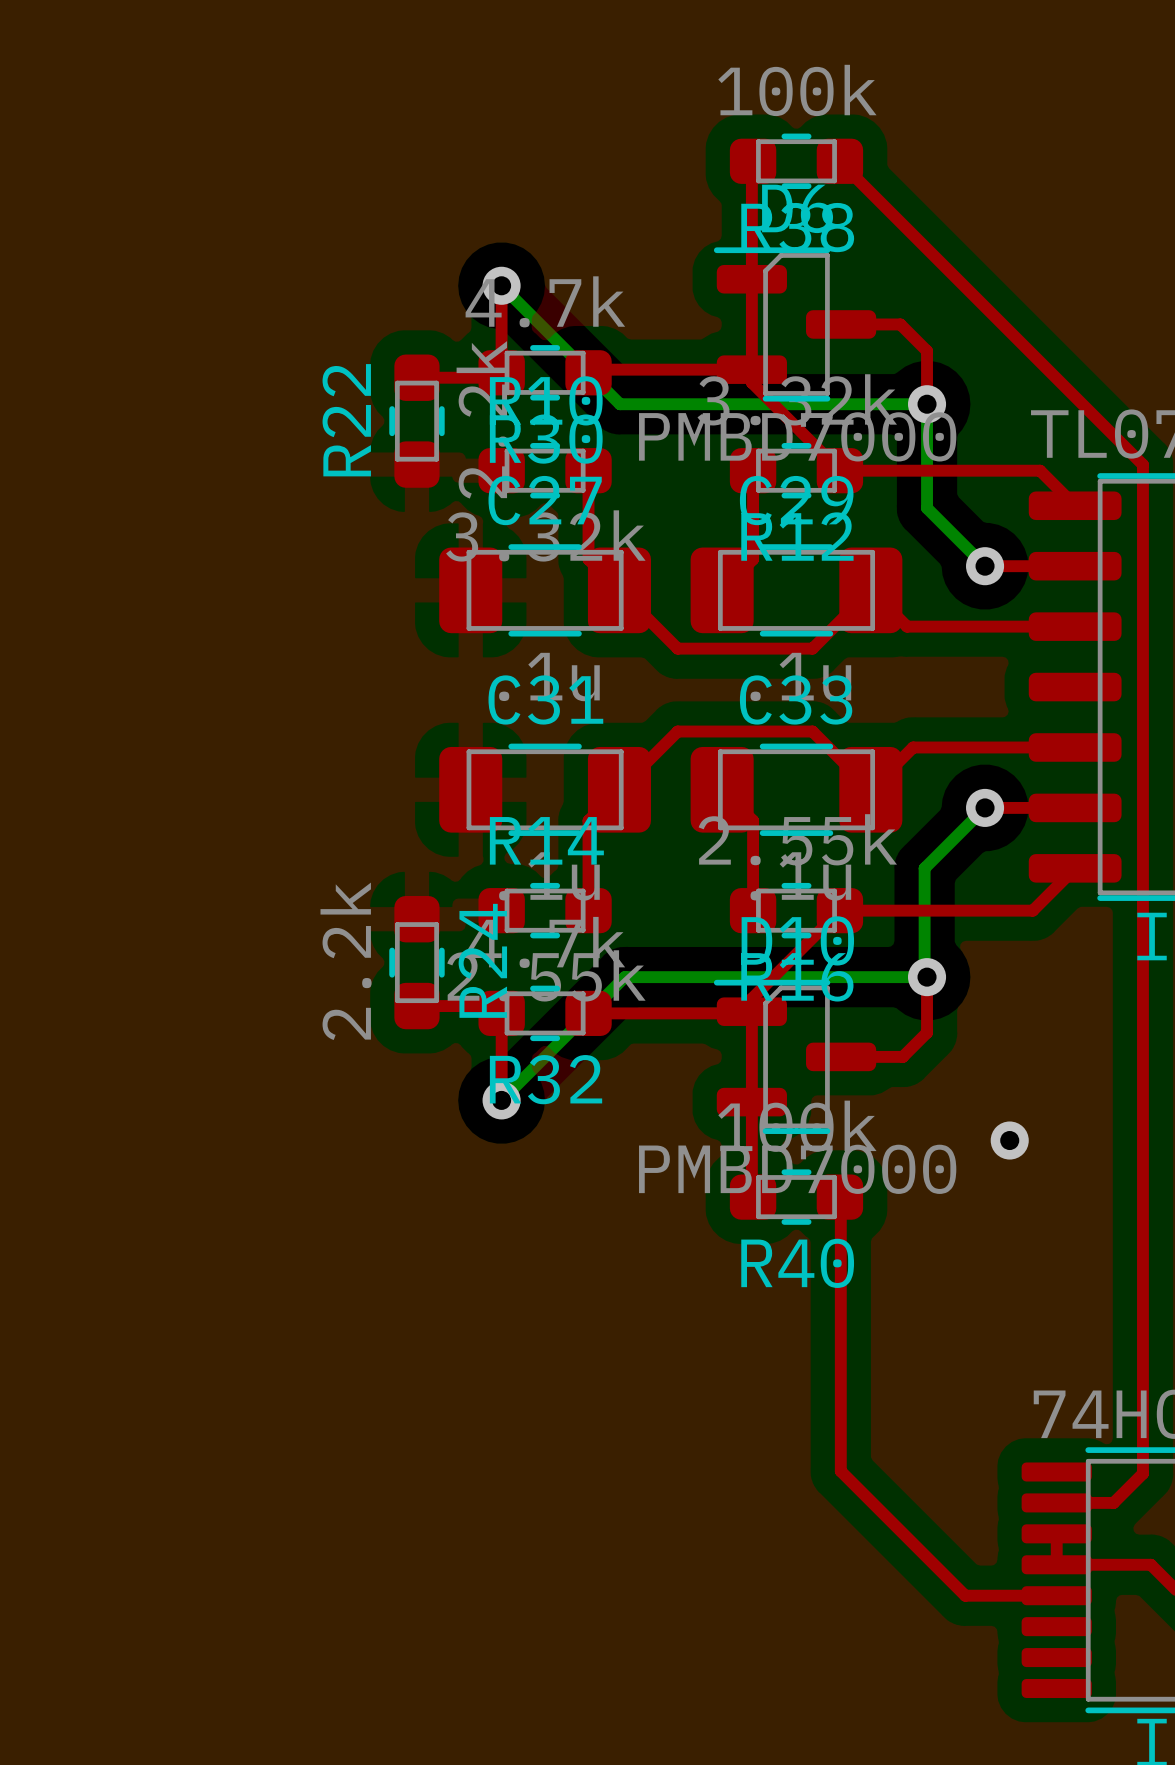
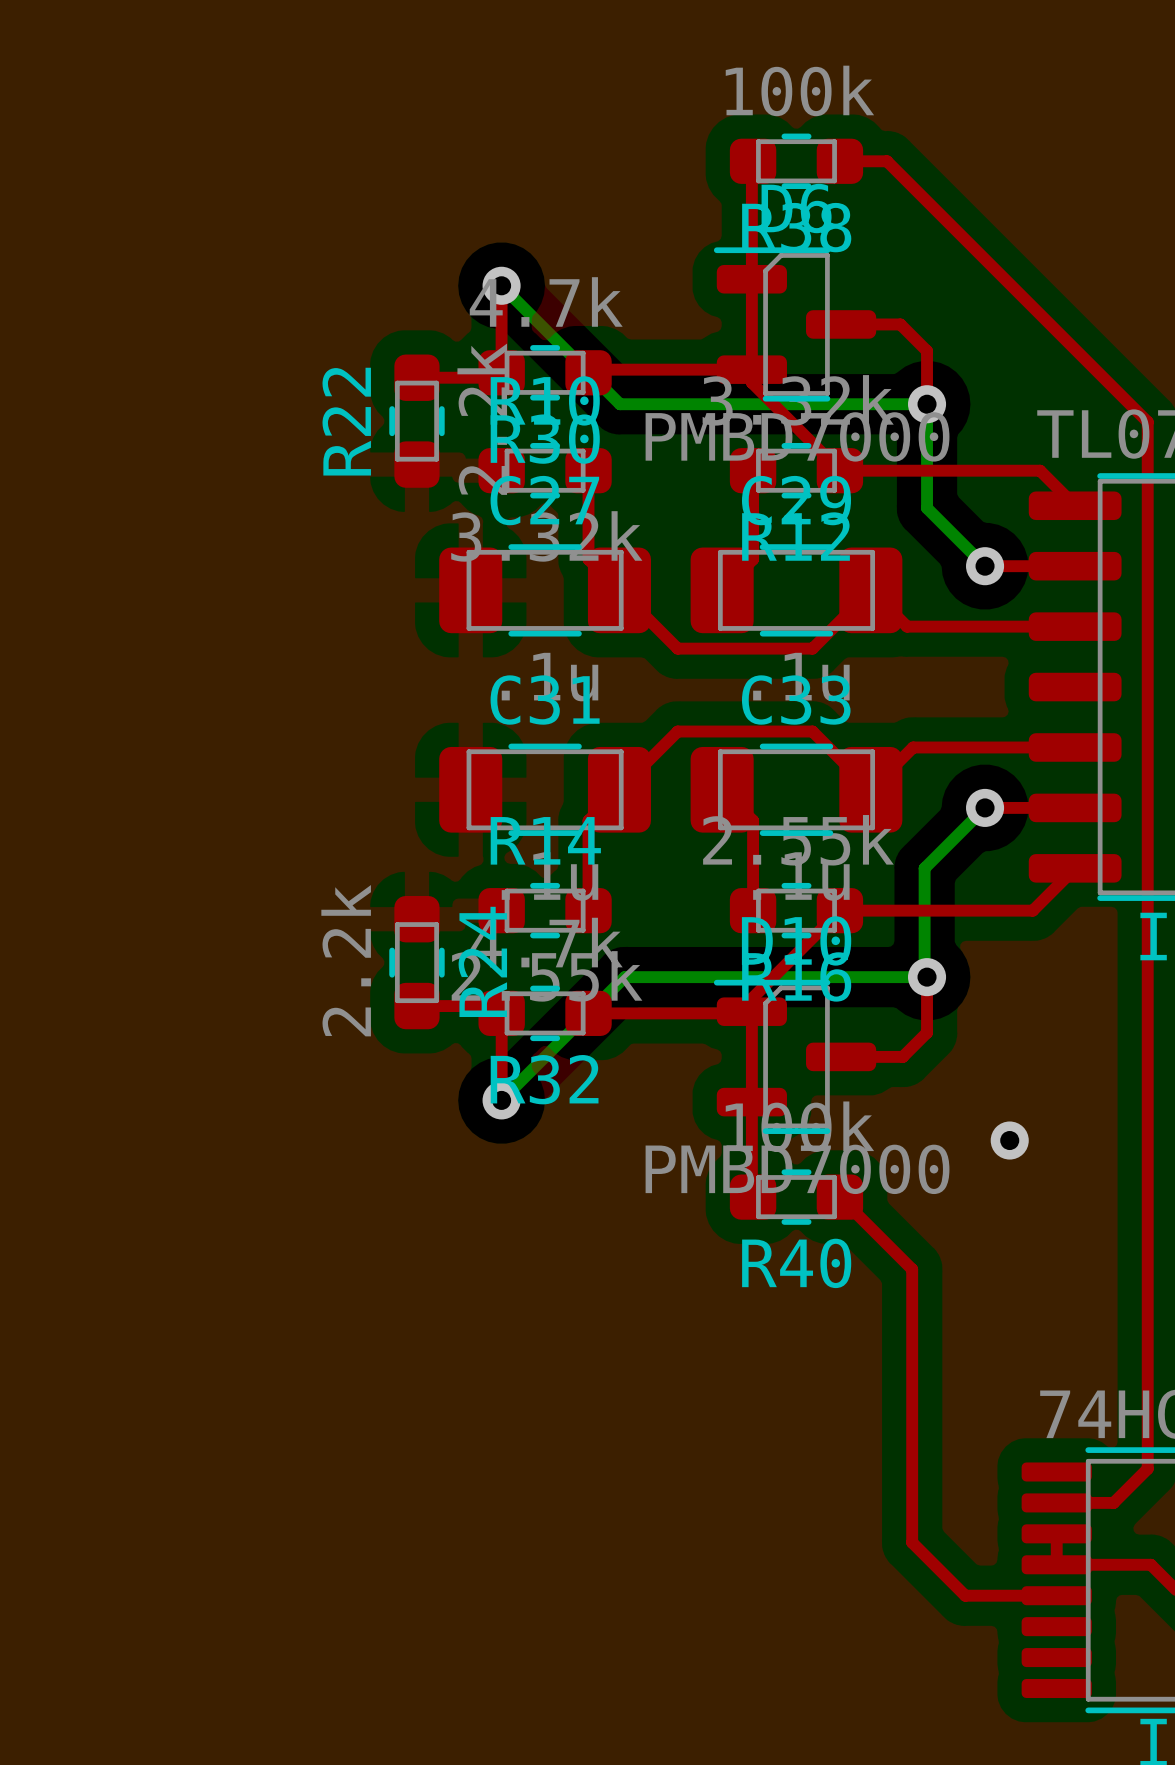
top track: (839, 161) (1142, 464) (1142, 1473) -> (839, 161) (887, 161) (1147, 421) (1147, 1468) (1142, 1473)
top track: (840, 1197) (840, 1471) (912, 1542) -> (840, 1197) (912, 1269) (912, 1542)

